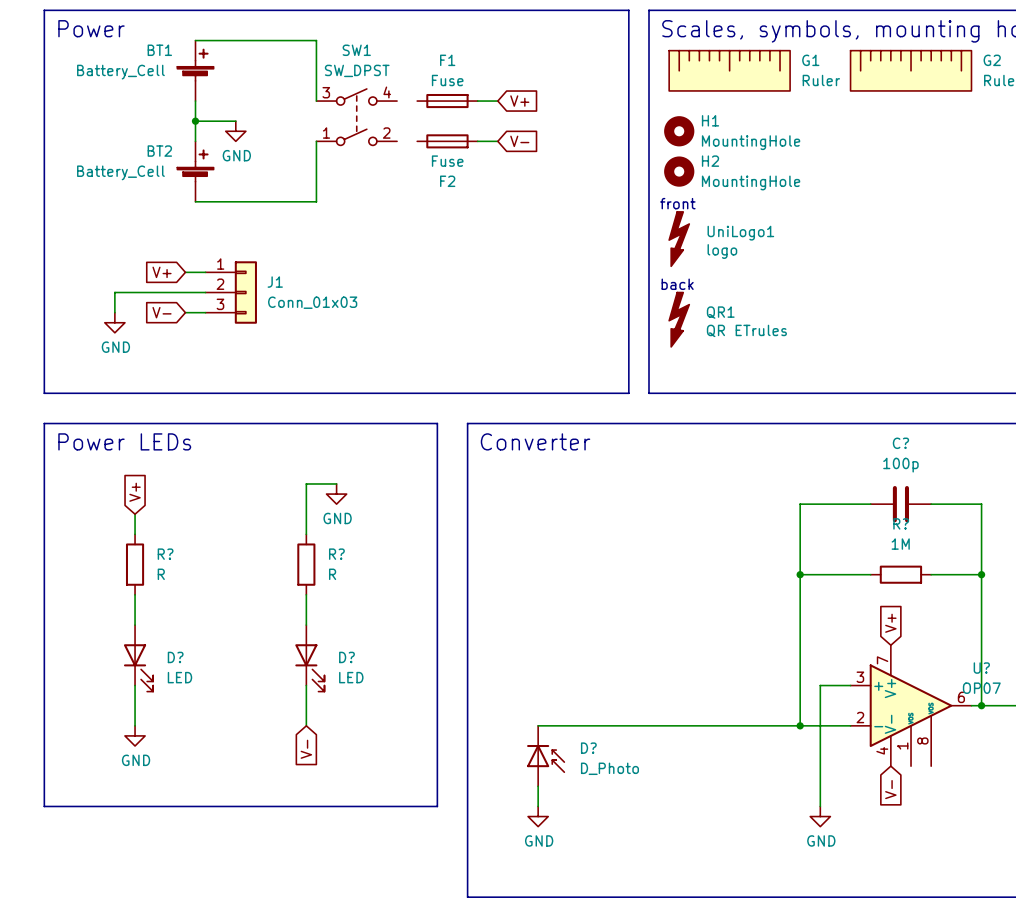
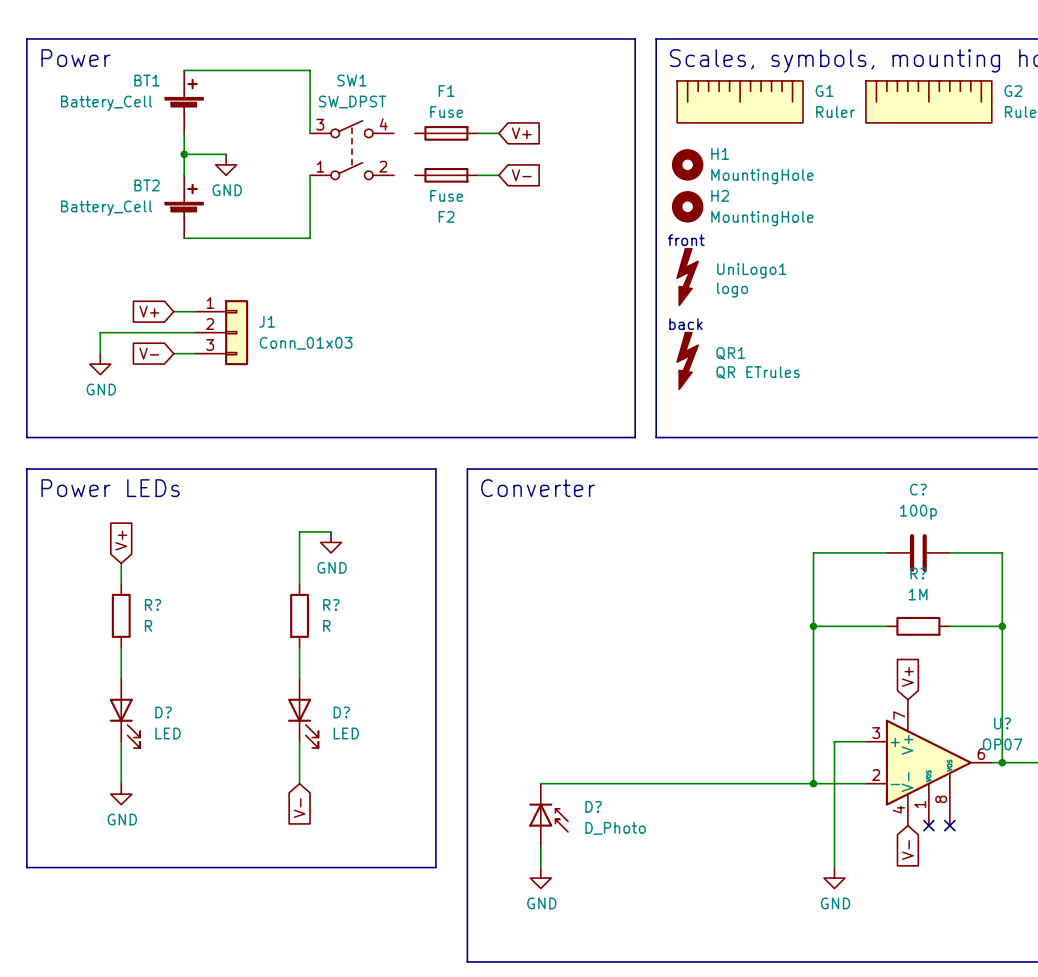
no-connect mark: none -> (928, 825)
no-connect mark: none -> (949, 825)

